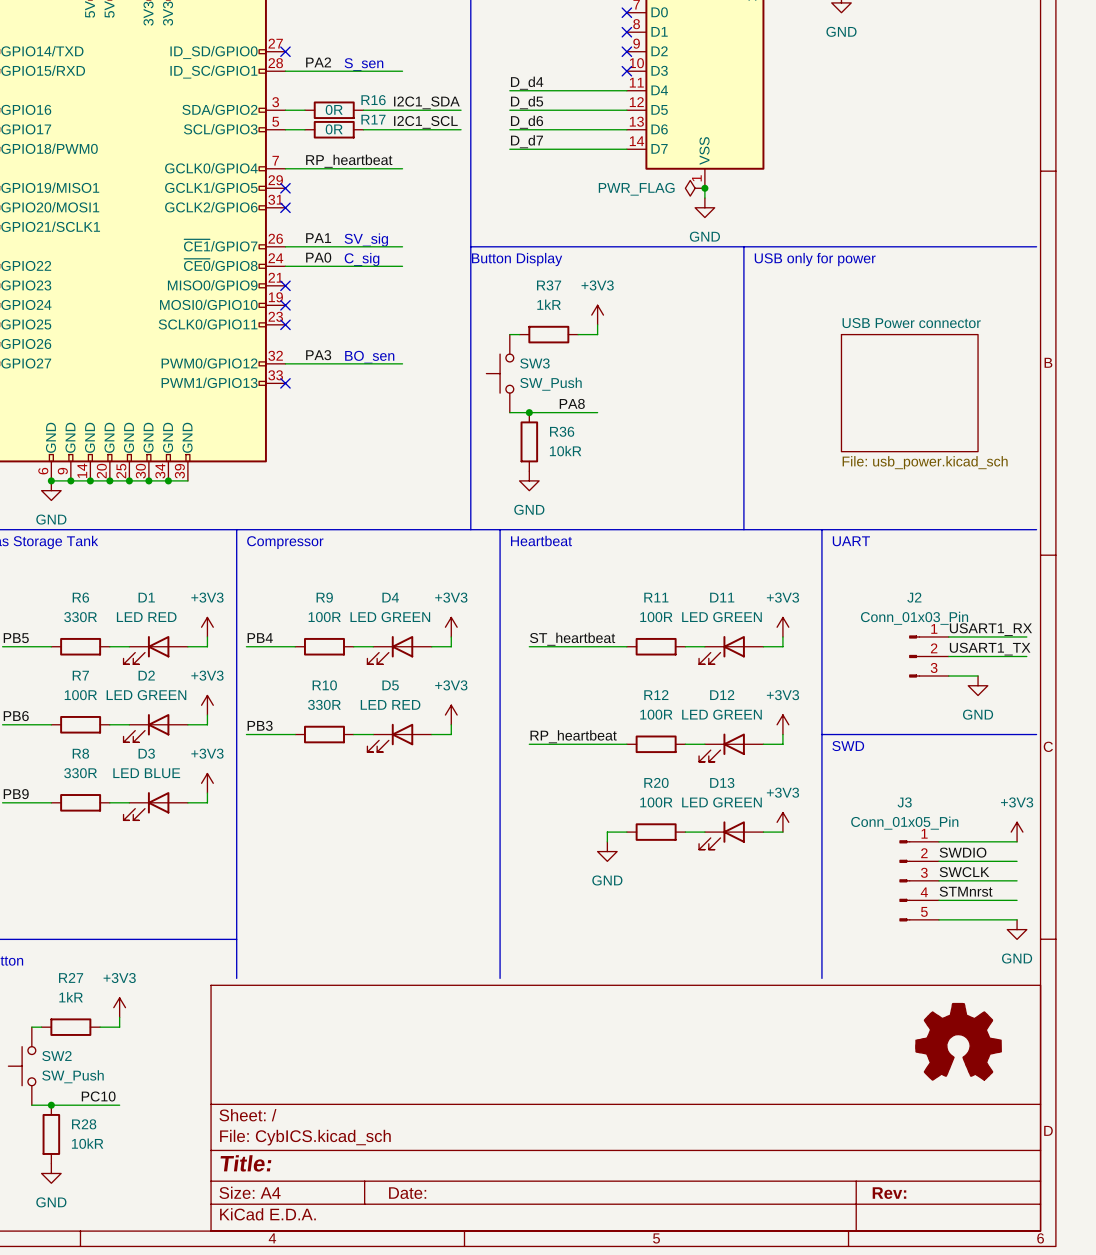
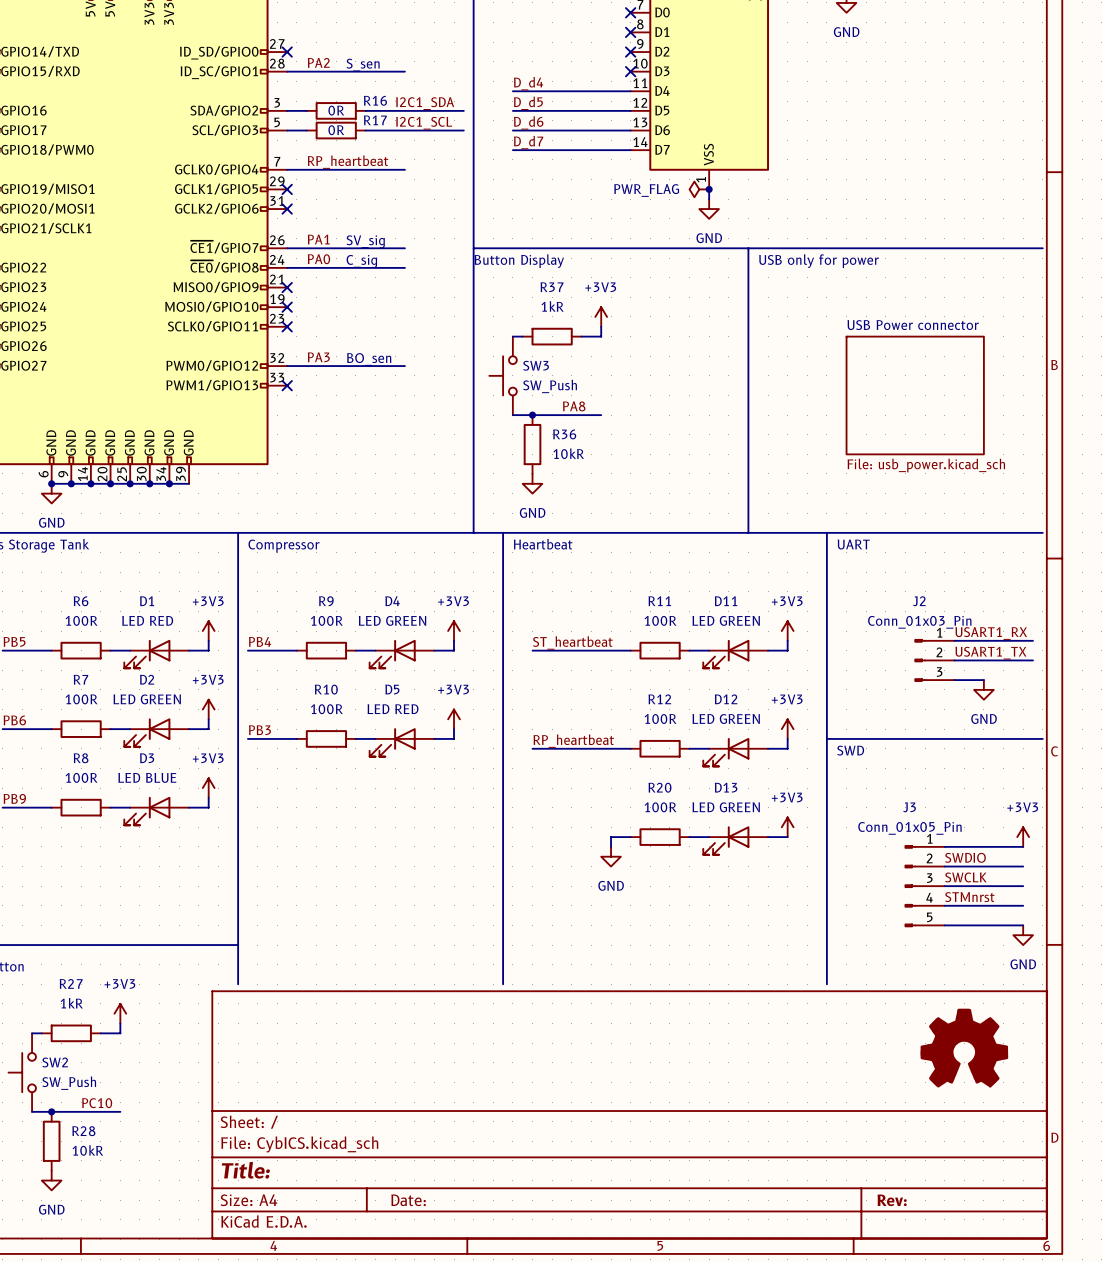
R6 value: 330R (80, 617) -> 100R (81, 620)
R10 value: 330R (324, 704) -> 100R (326, 709)
R8 value: 330R (80, 773) -> 100R (81, 777)

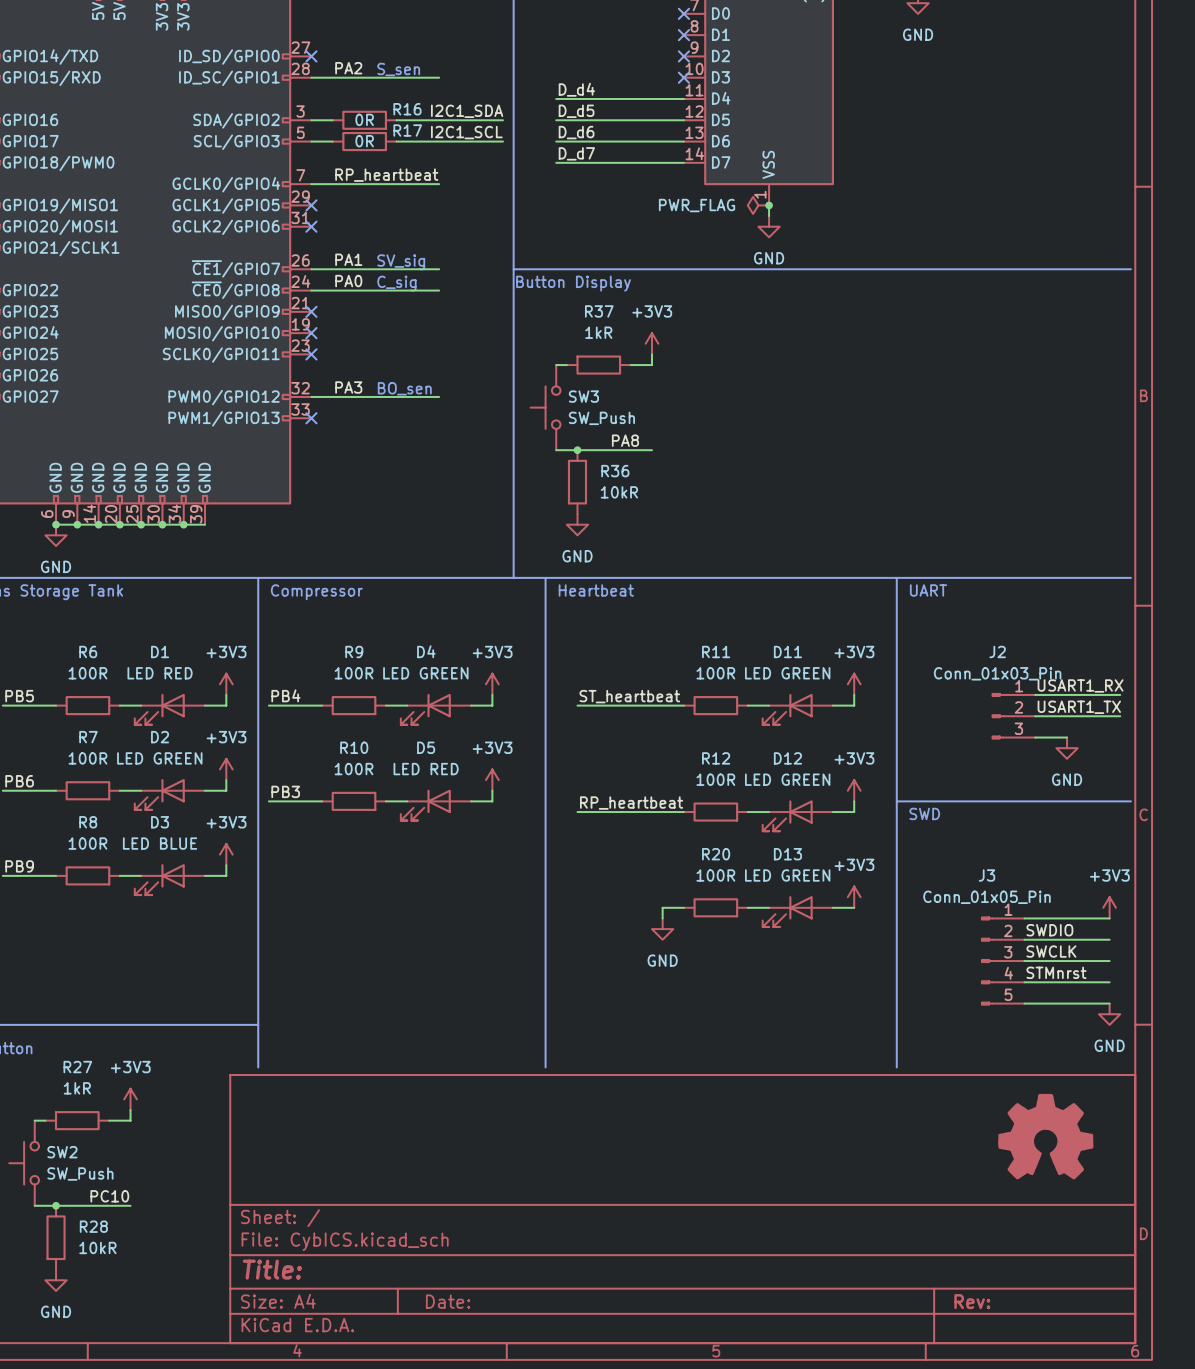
line: (748, 248) (748, 532) -> none
text: USB only for power (819, 261) -> none
sheet USB Power connector: File: usb_power.kicad_sch (915, 395) -> none

